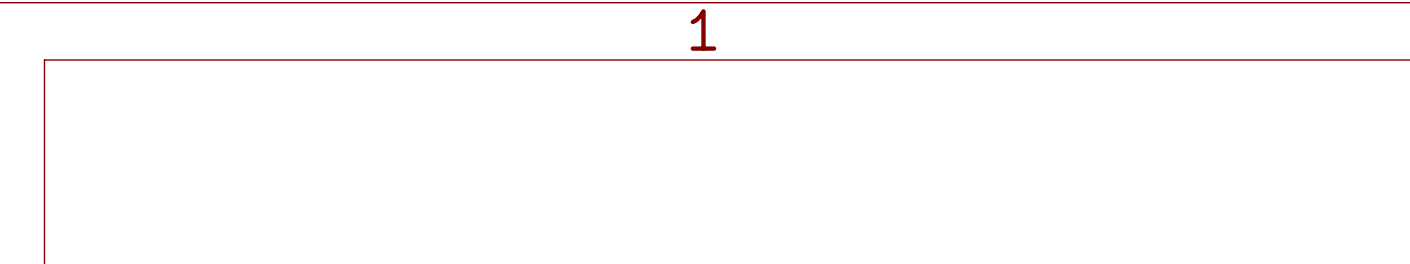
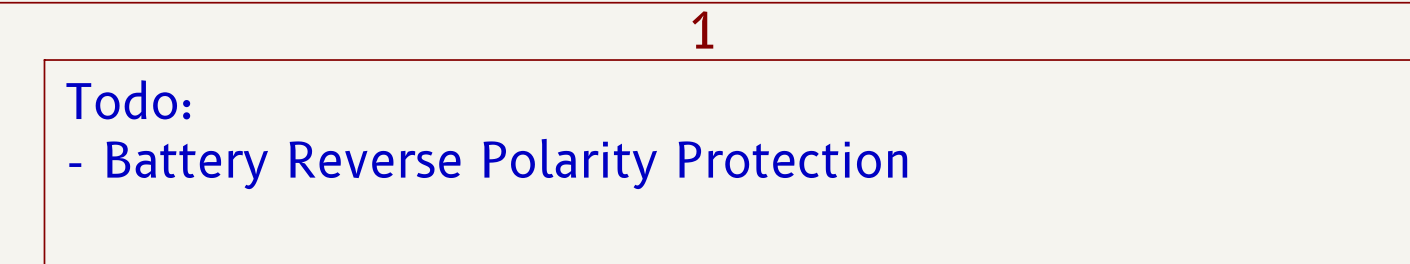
text: none -> Todo: (128, 99)
text: none -> - Battery Reverse Polarity Protection (488, 163)

